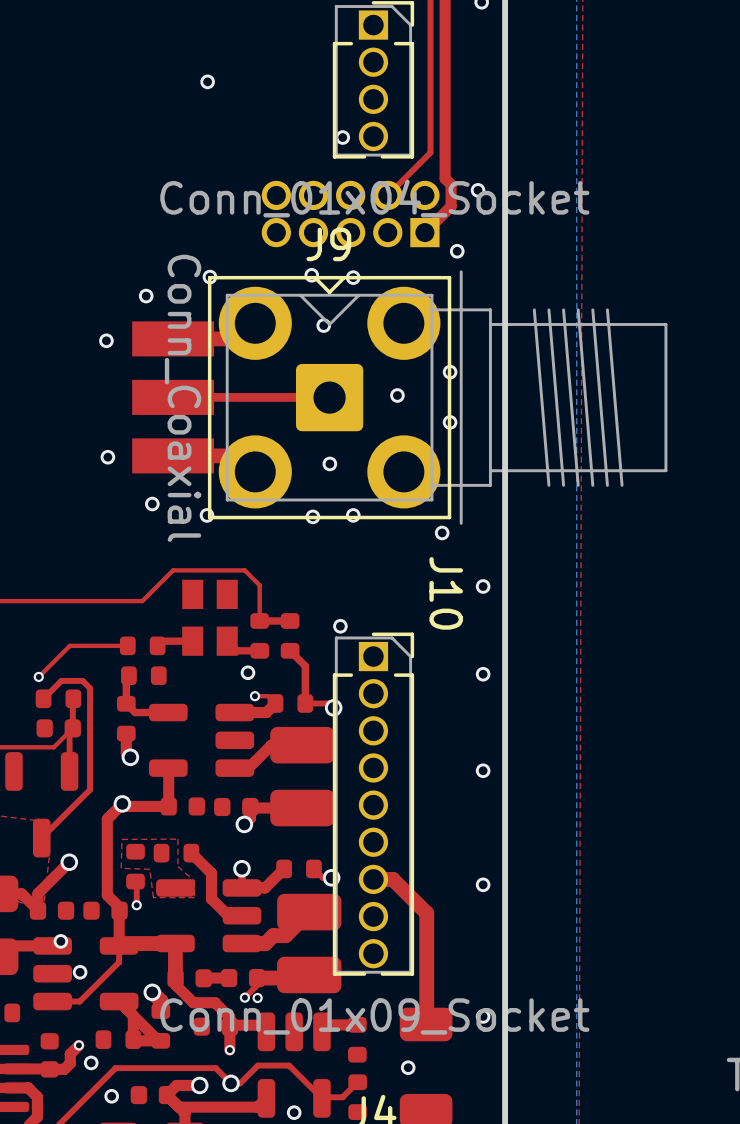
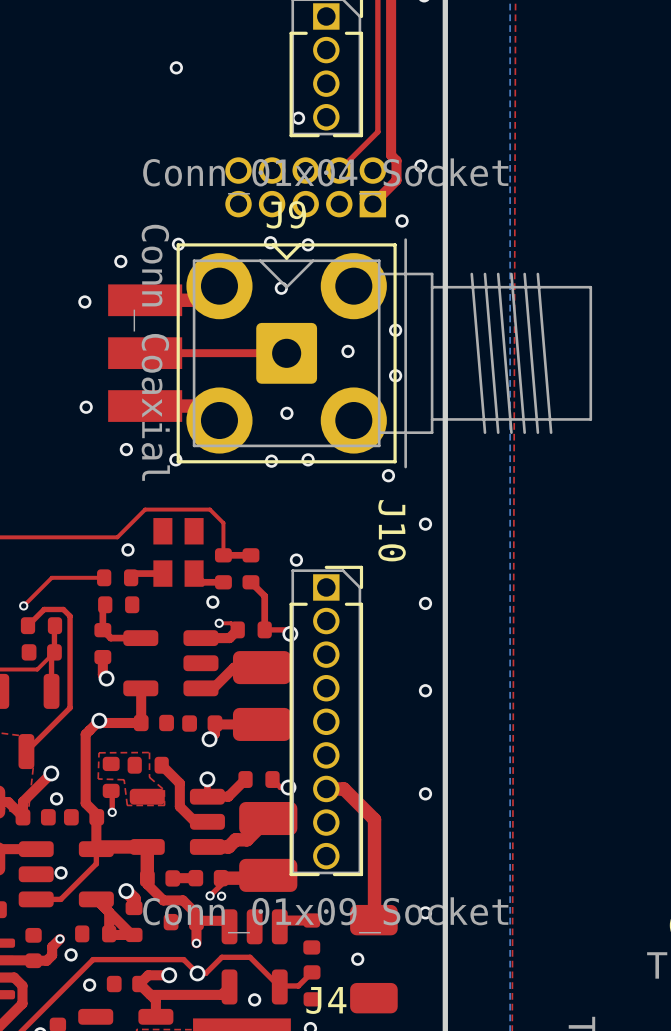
via: none -> (127, 549)
via position: (60, 941) -> (56, 798)

